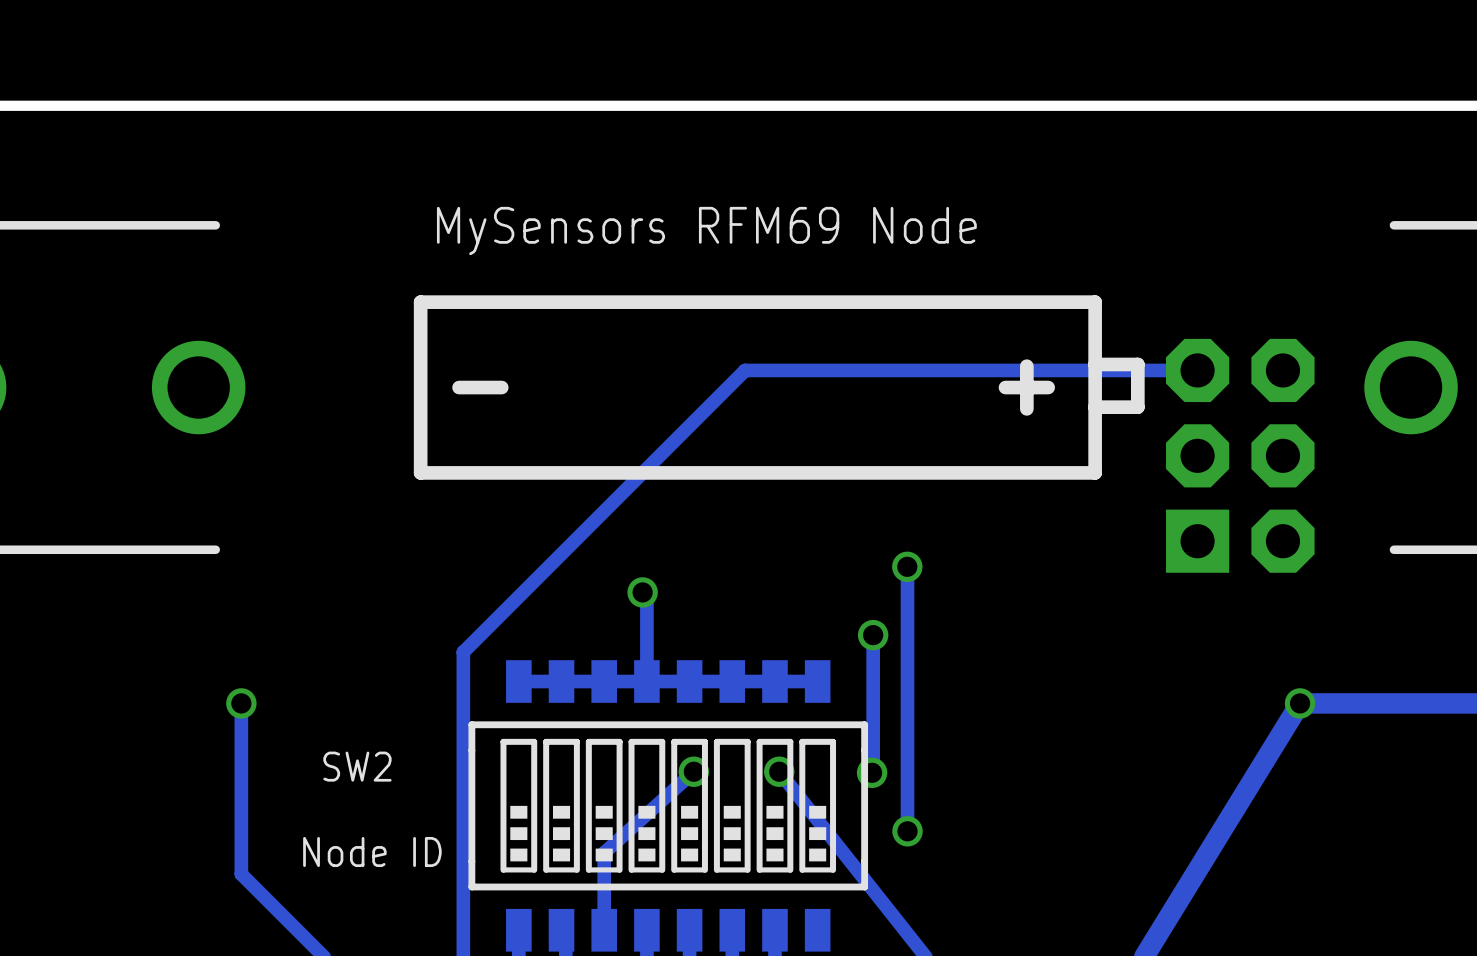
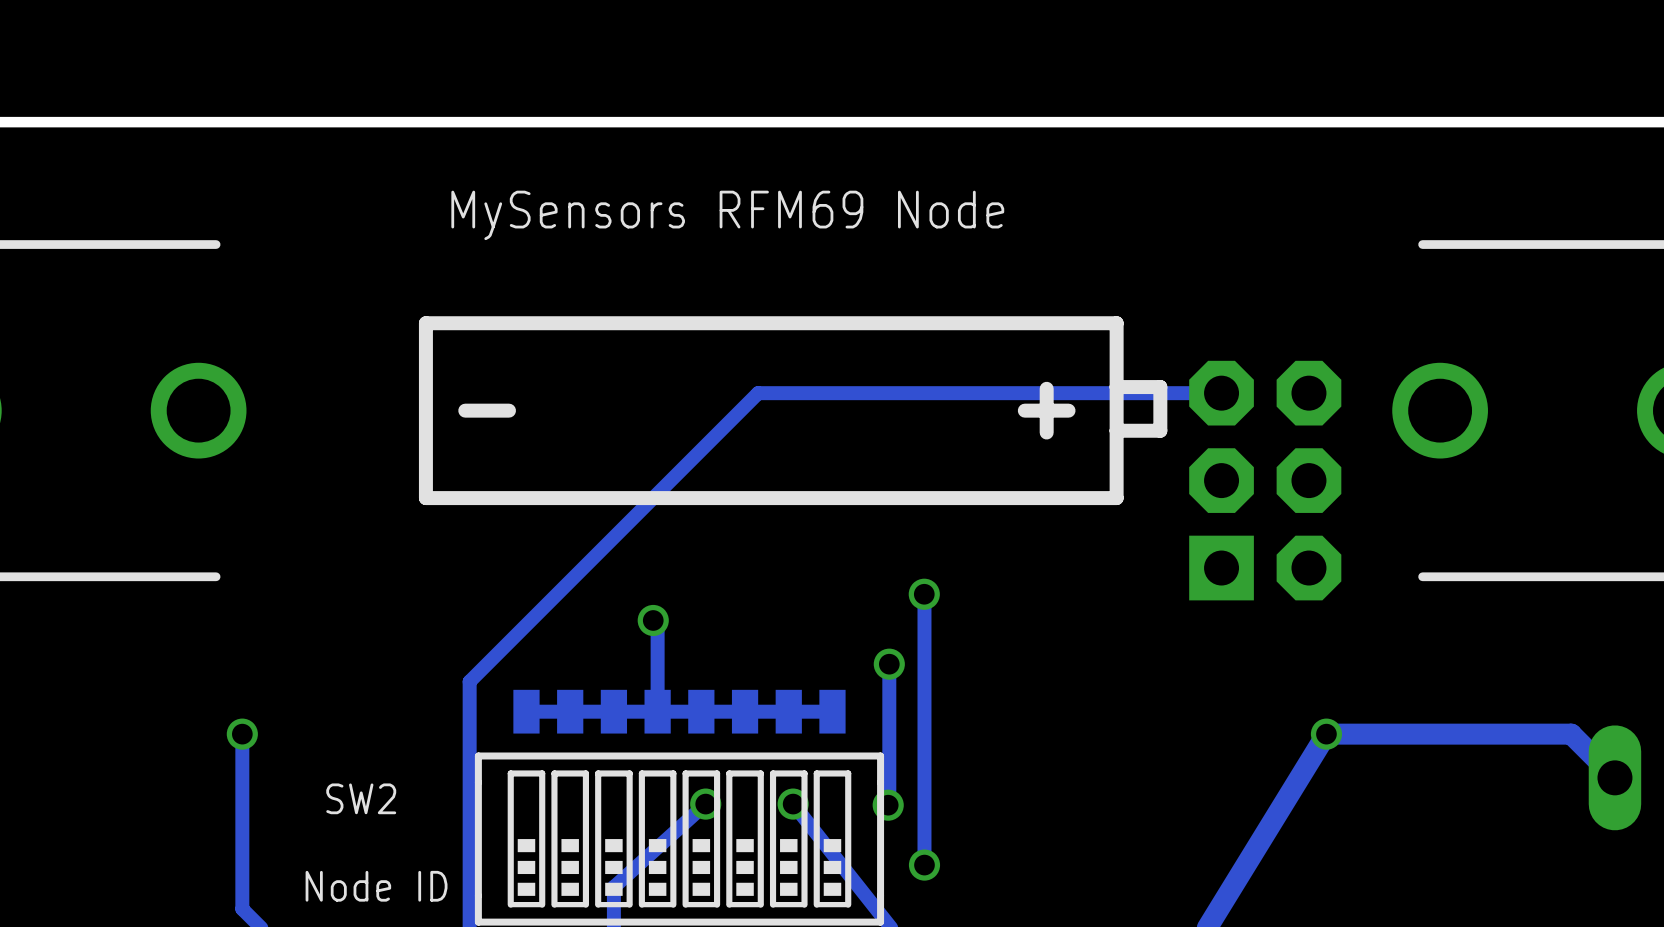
text position: MySensors RFM69 Node (706, 231) -> MySensors RFM69 Node (727, 215)

